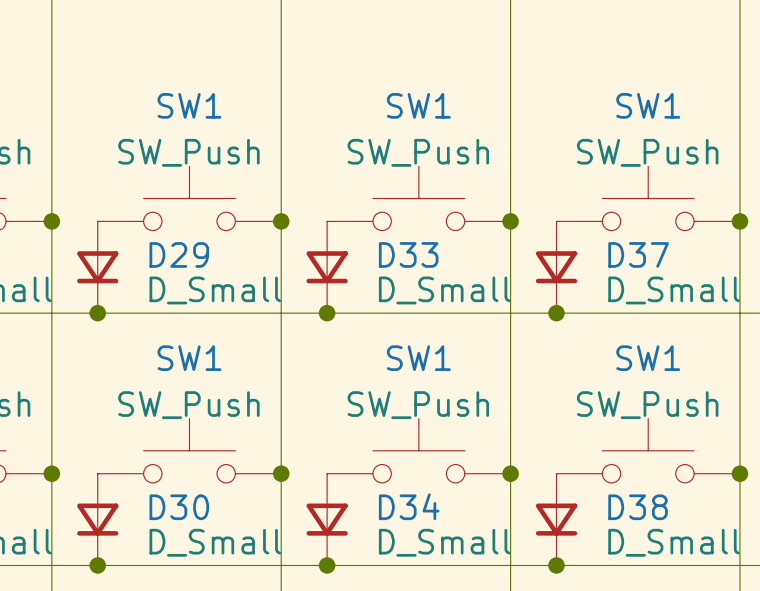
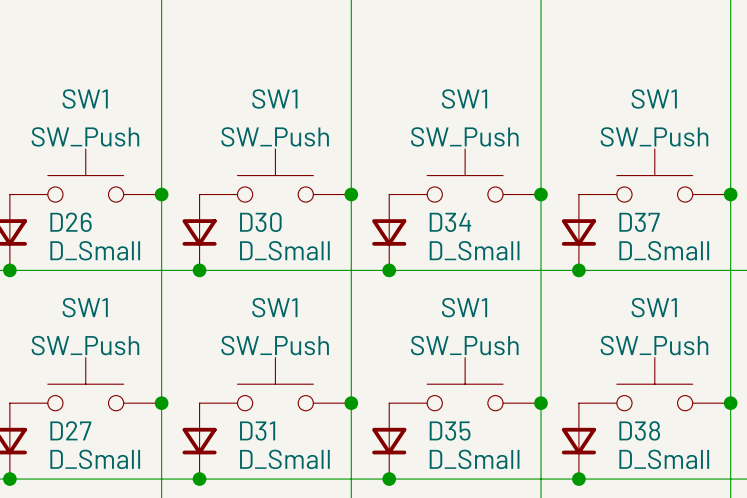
D29 name: D29 (179, 254) -> D30 (260, 222)
D33 name: D33 (408, 254) -> D34 (450, 222)
D34 name: D34 (409, 506) -> D35 (450, 431)
D30 name: D30 (179, 507) -> D31 (257, 431)

